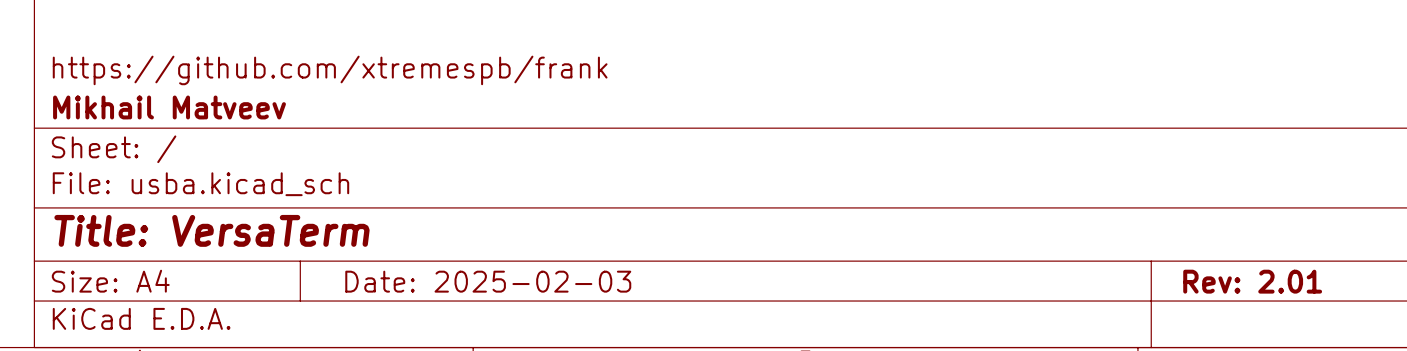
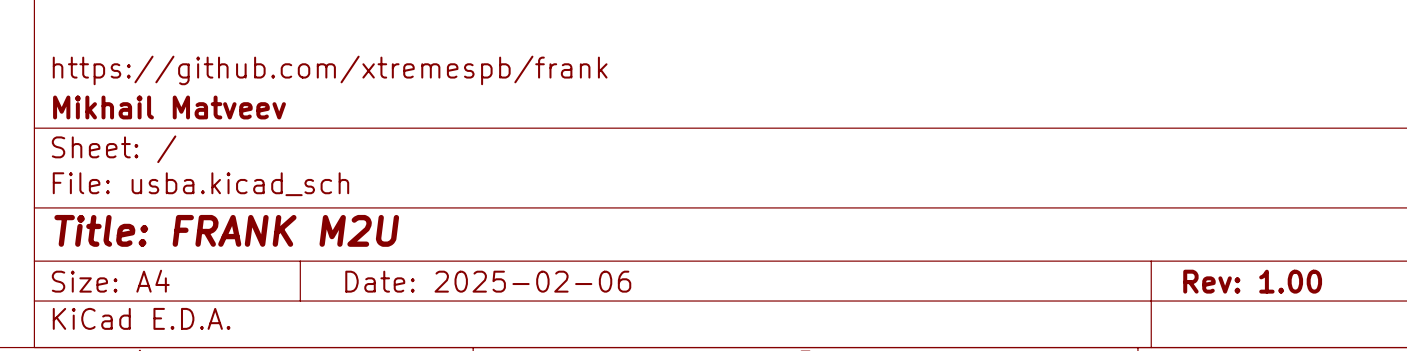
title block: Title: VersaTerm (212, 230) -> Title: FRANK M2U (226, 230)
title block: Date: 2025-02-03 (488, 281) -> Date: 2025-02-06 (488, 281)
title block: Rev: 2.01 (1252, 281) -> Rev: 1.00 (1252, 281)

